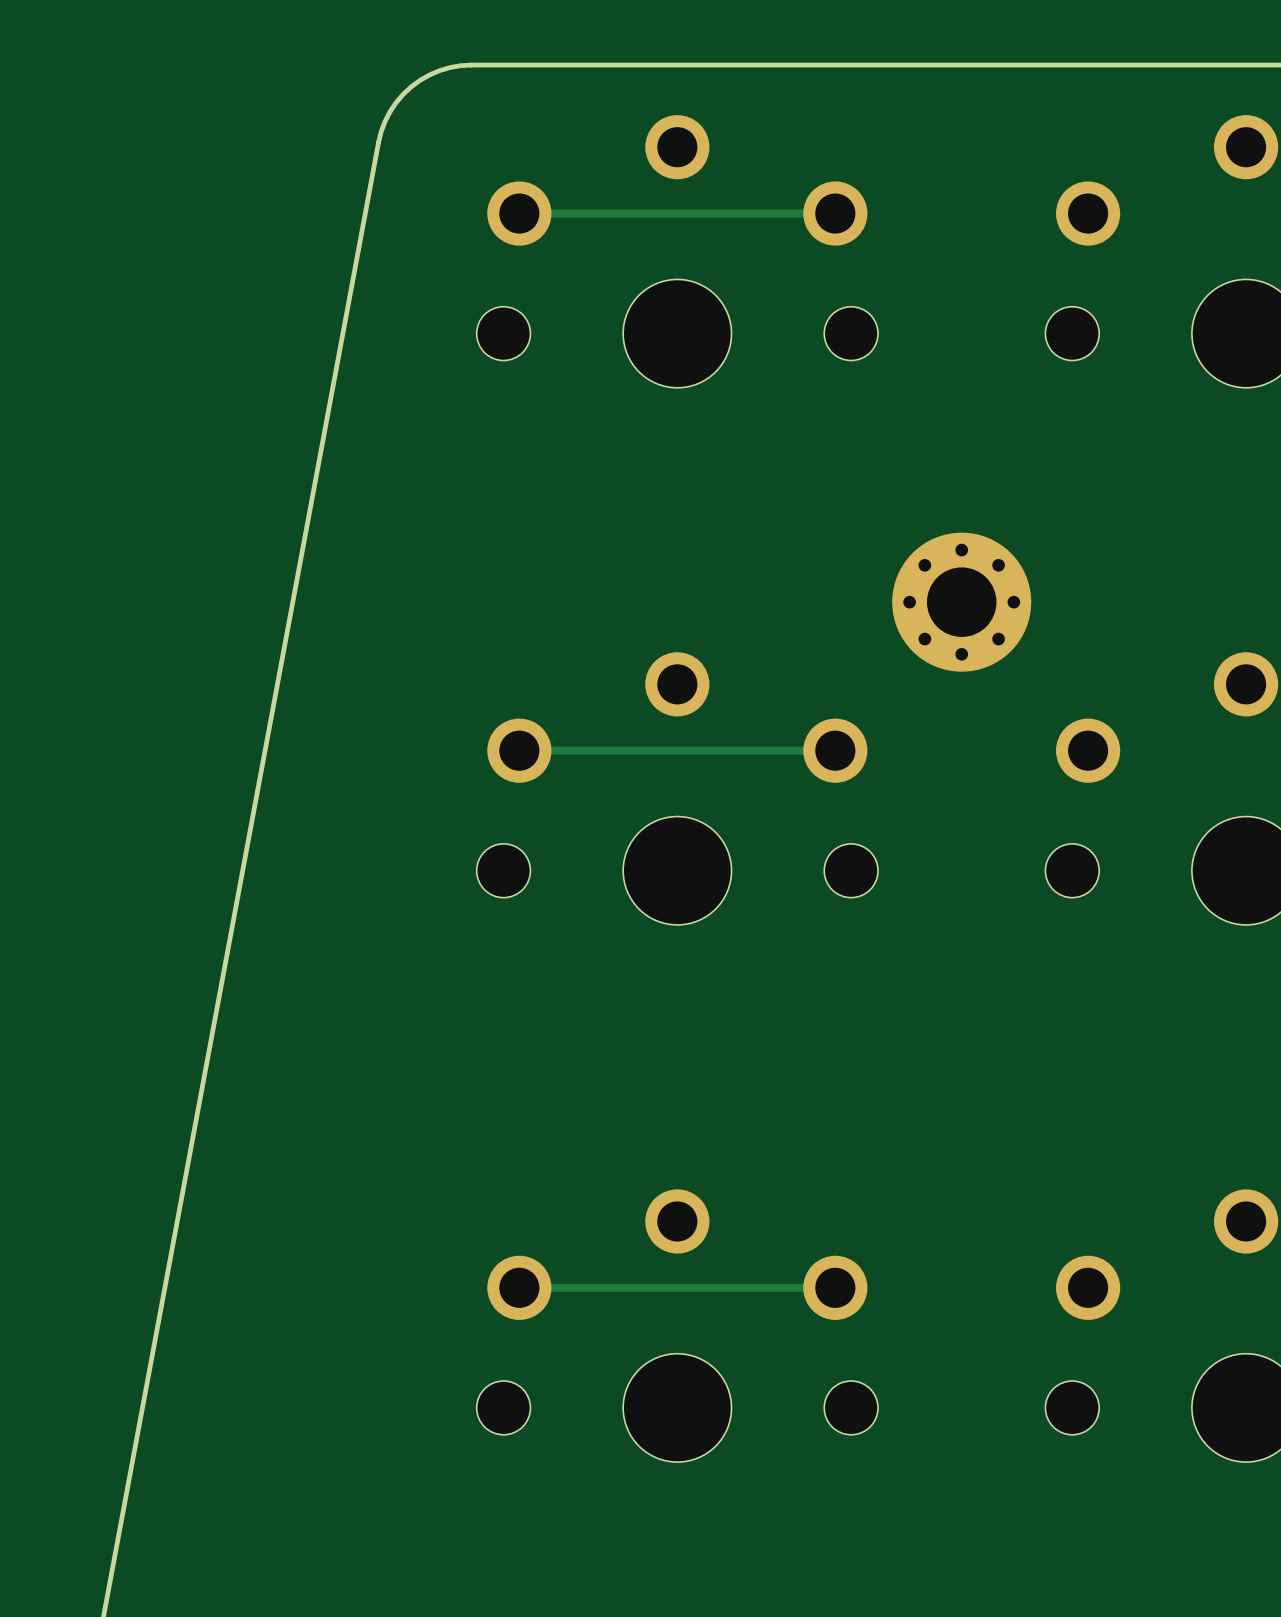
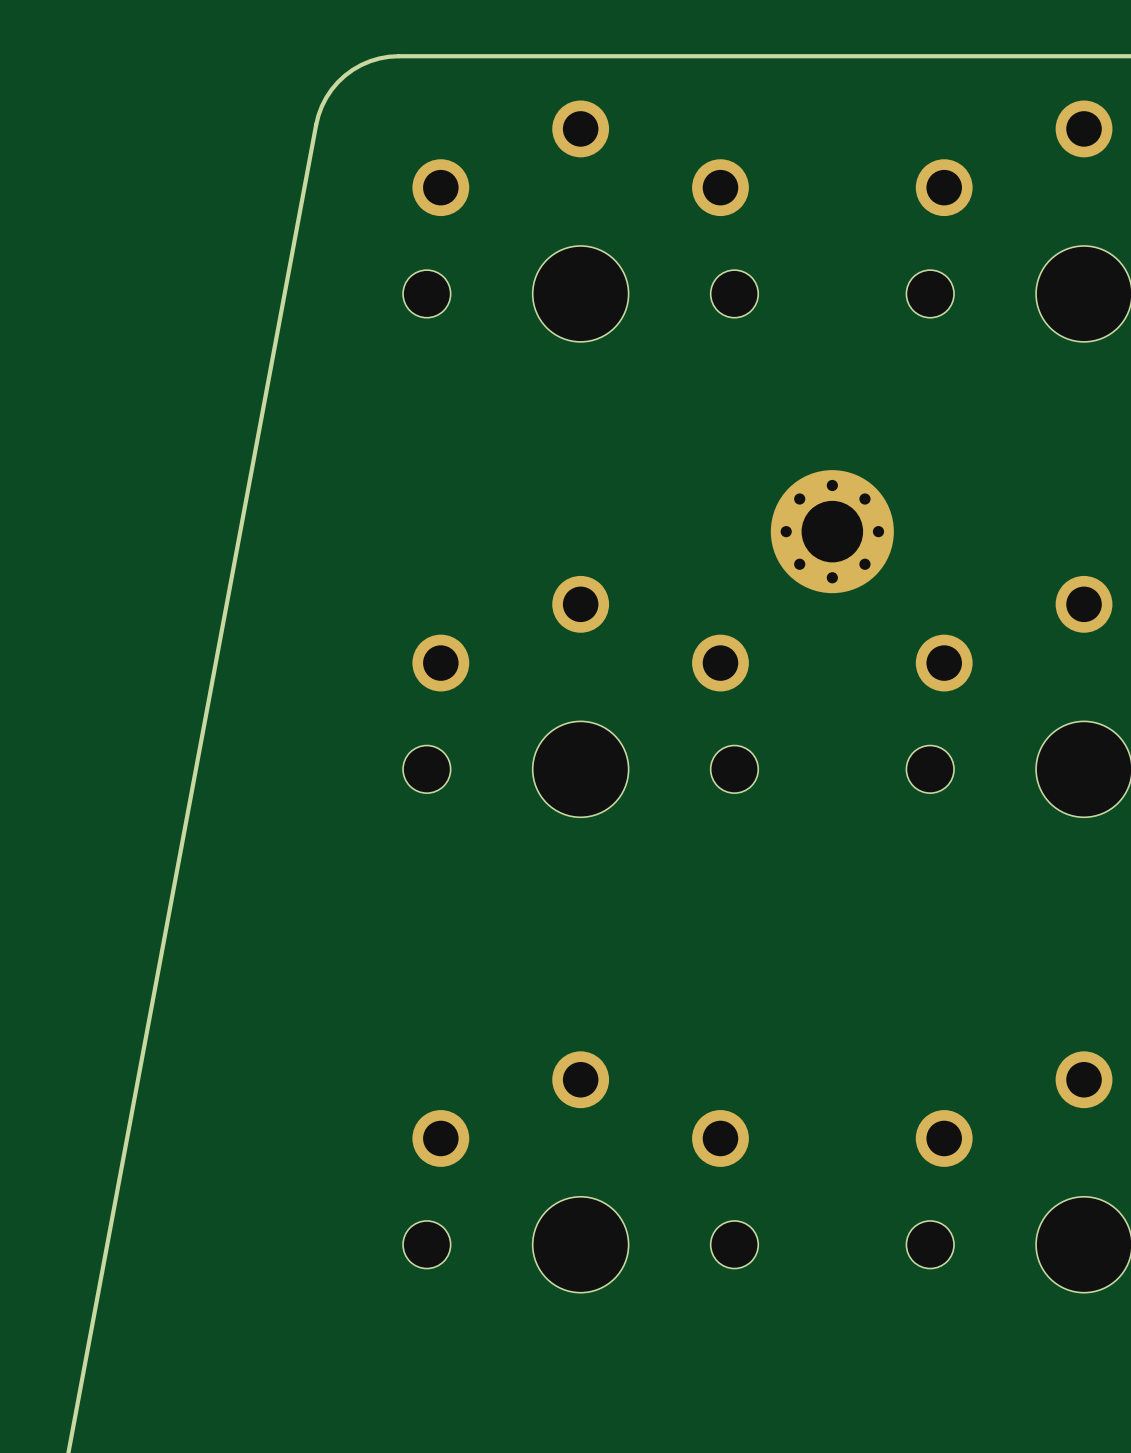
track: (835, 213) (519, 213) -> none
track: (835, 750) (519, 750) -> none
track: (835, 1287) (519, 1287) -> none

